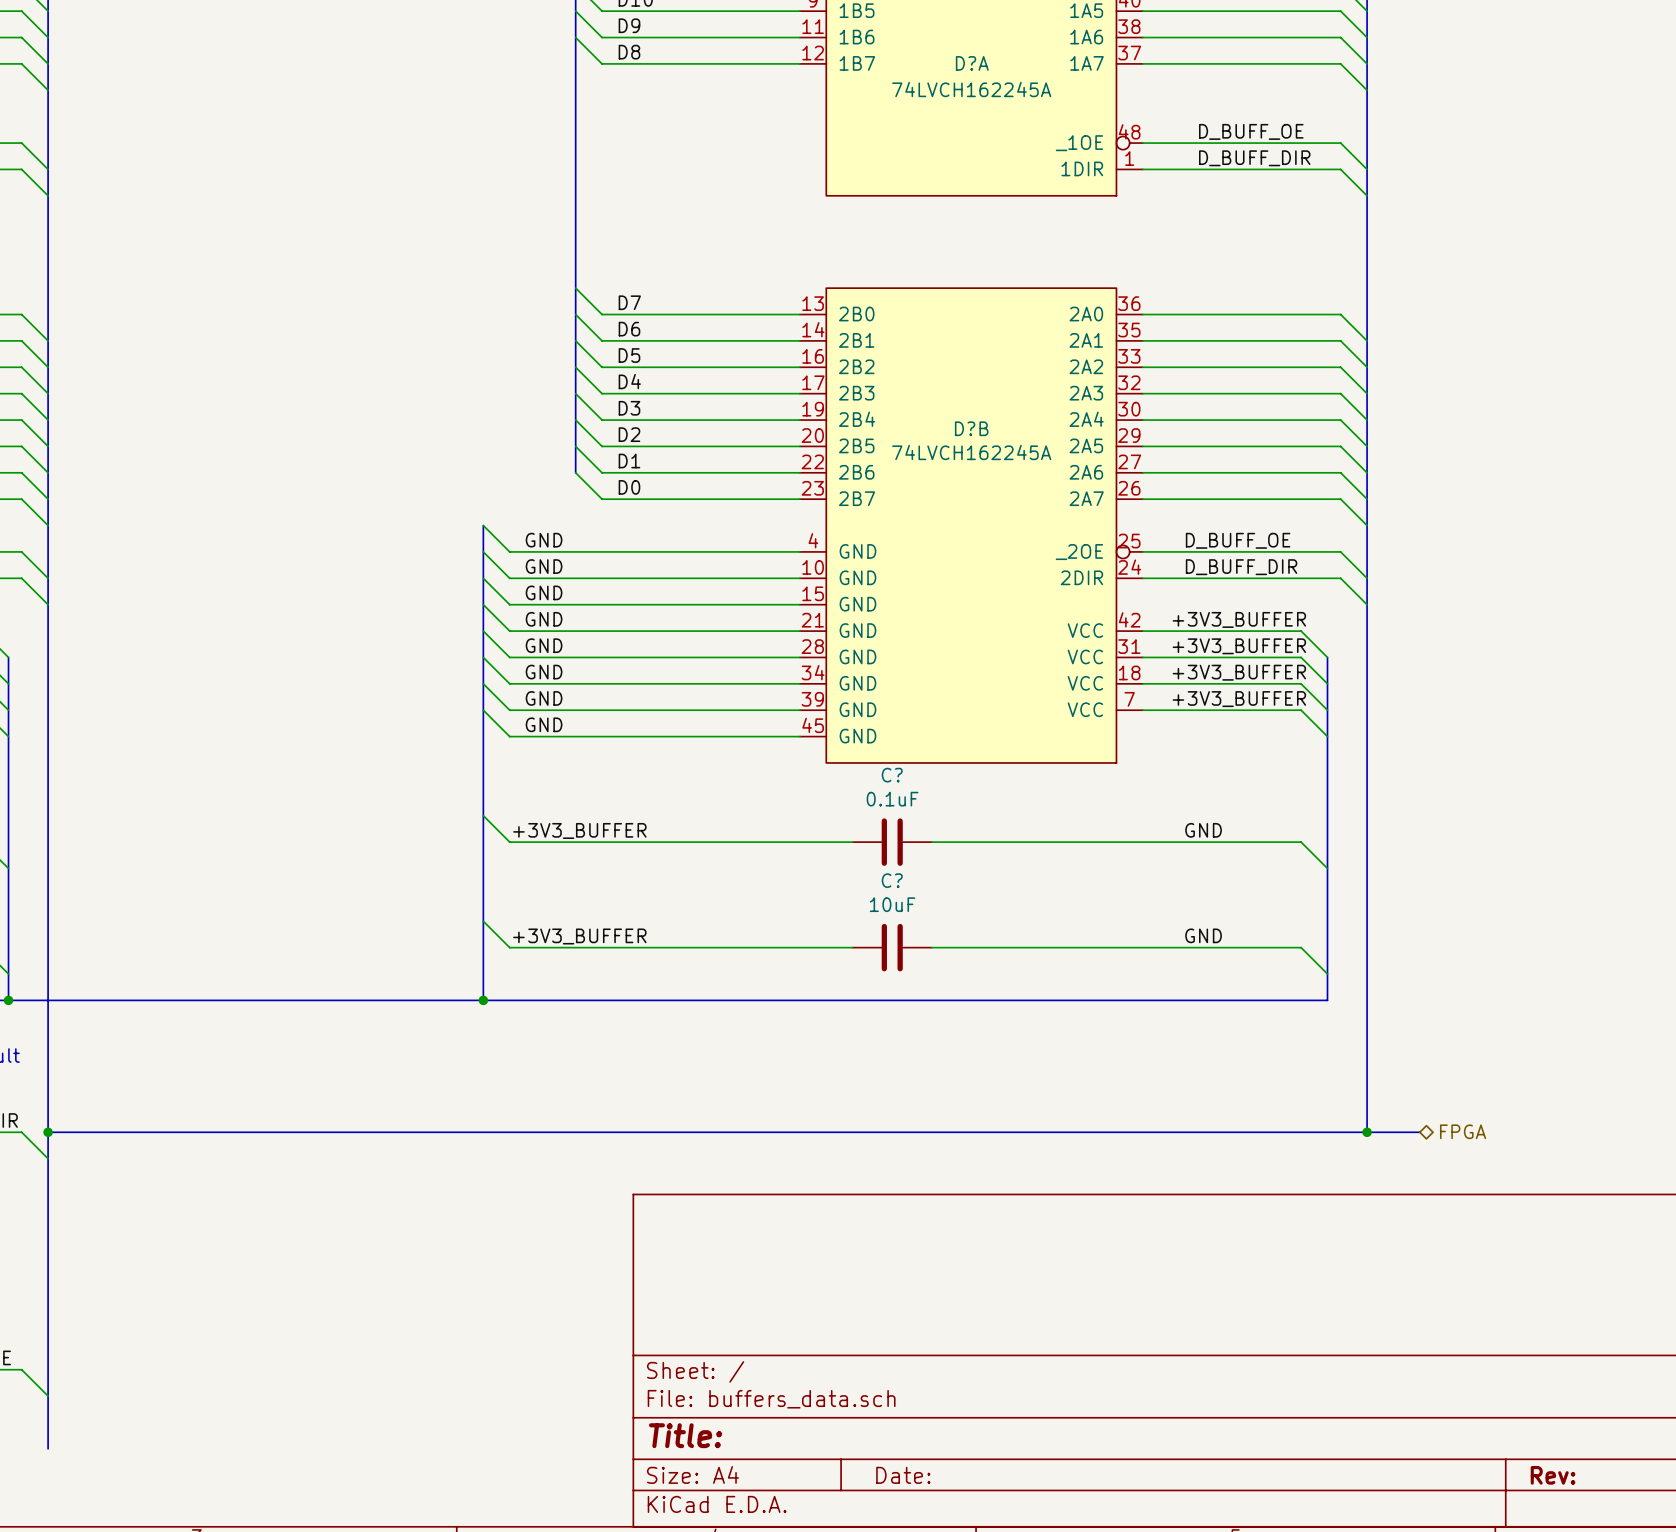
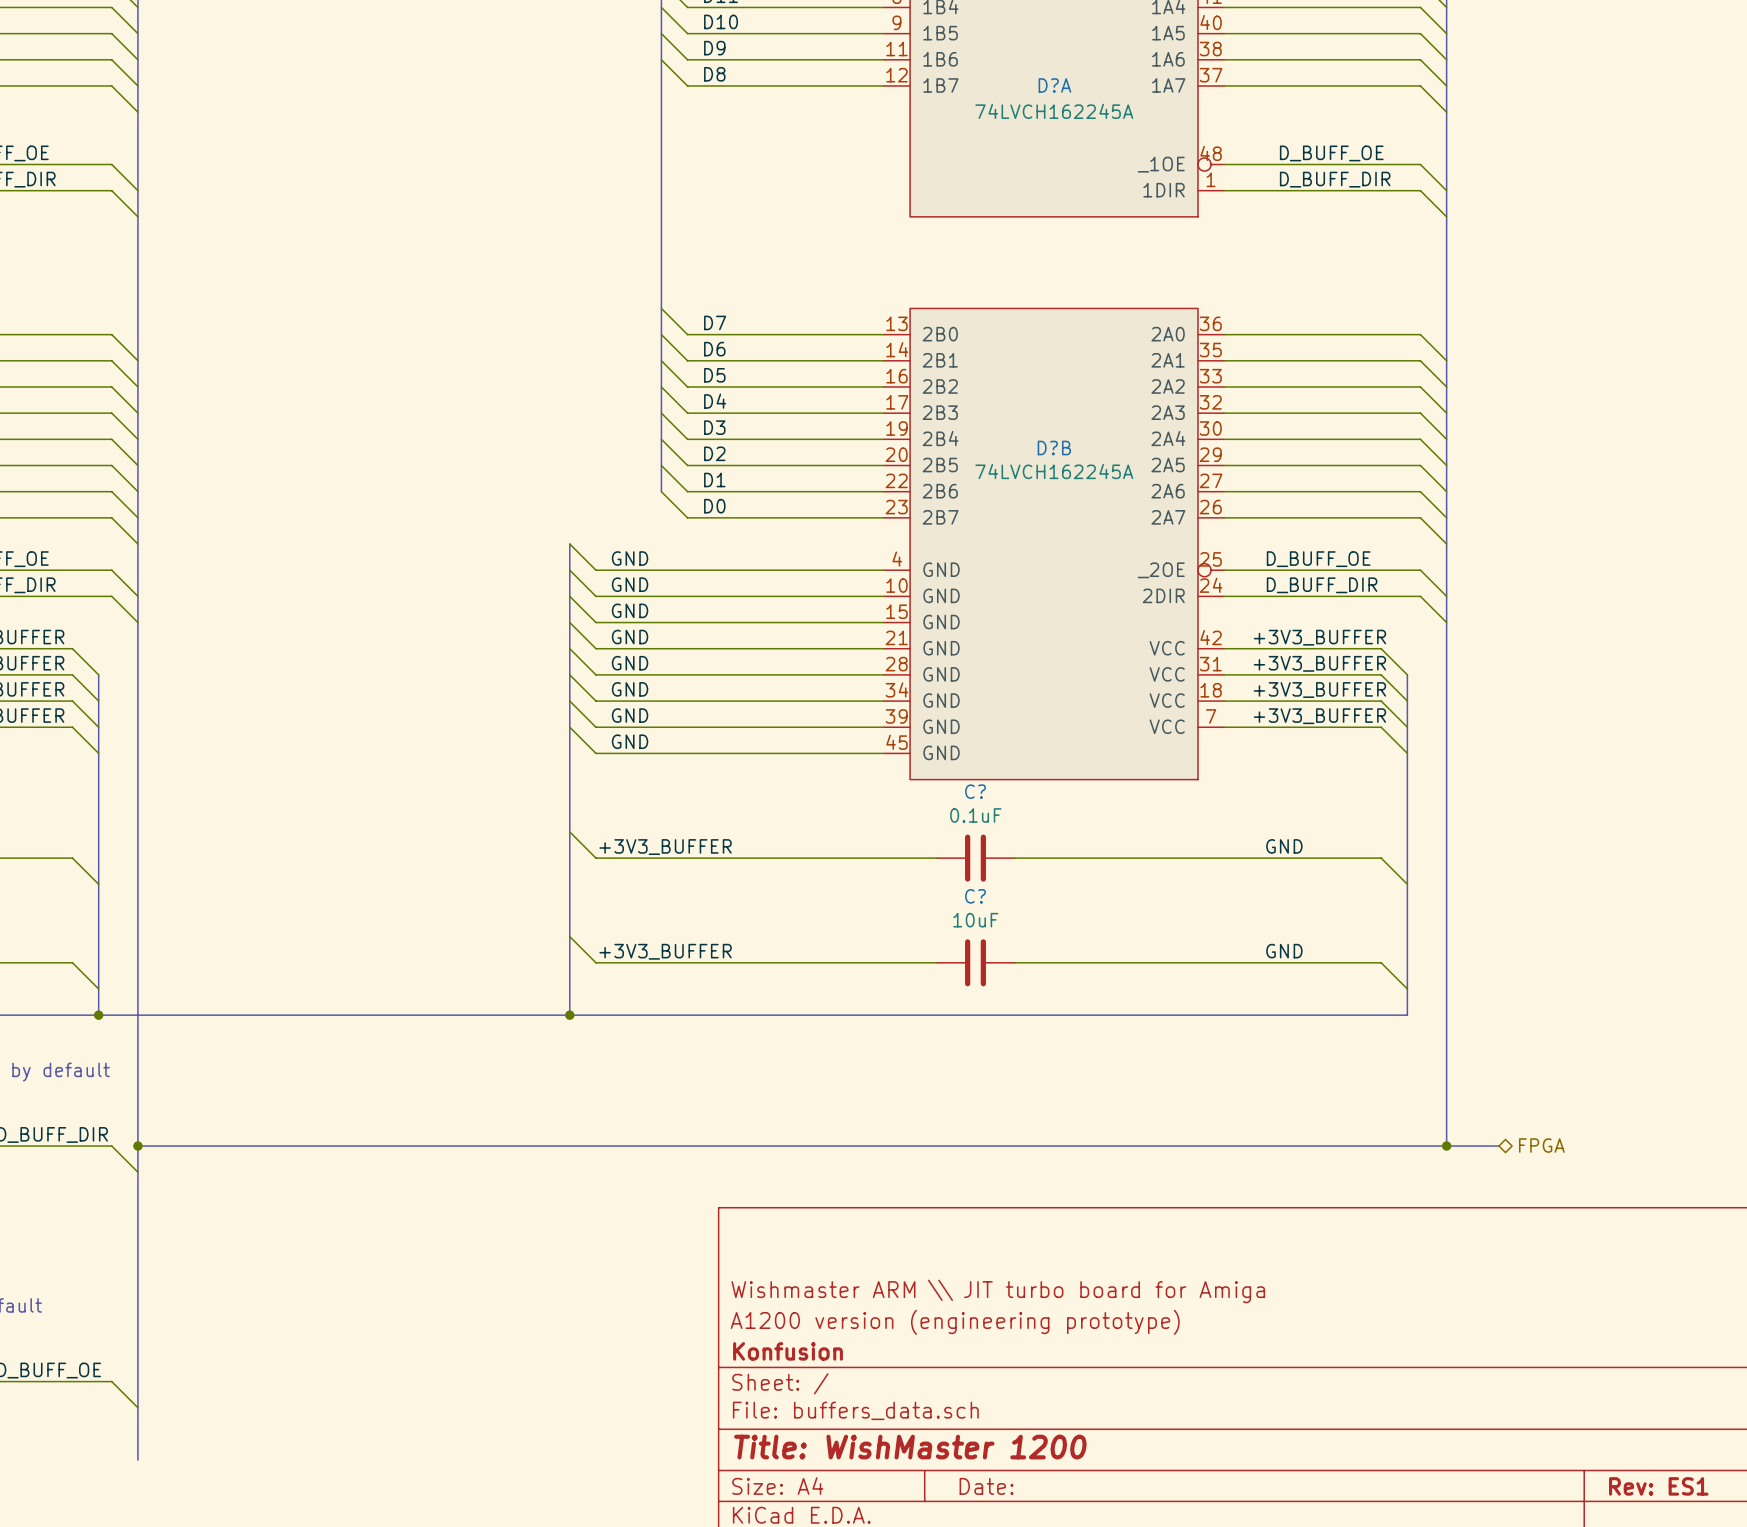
title block: none -> Wishmaster ARM \\ JIT turbo board for Amiga (998, 1291)
title block: none -> A1200 version (engineering prototype) (955, 1322)
title block: none -> Konfusion (788, 1351)
title block: Title: (685, 1435) -> Title: WishMaster 1200 (910, 1447)
title block: Rev: (1553, 1475) -> Rev: ES1 (1658, 1486)

